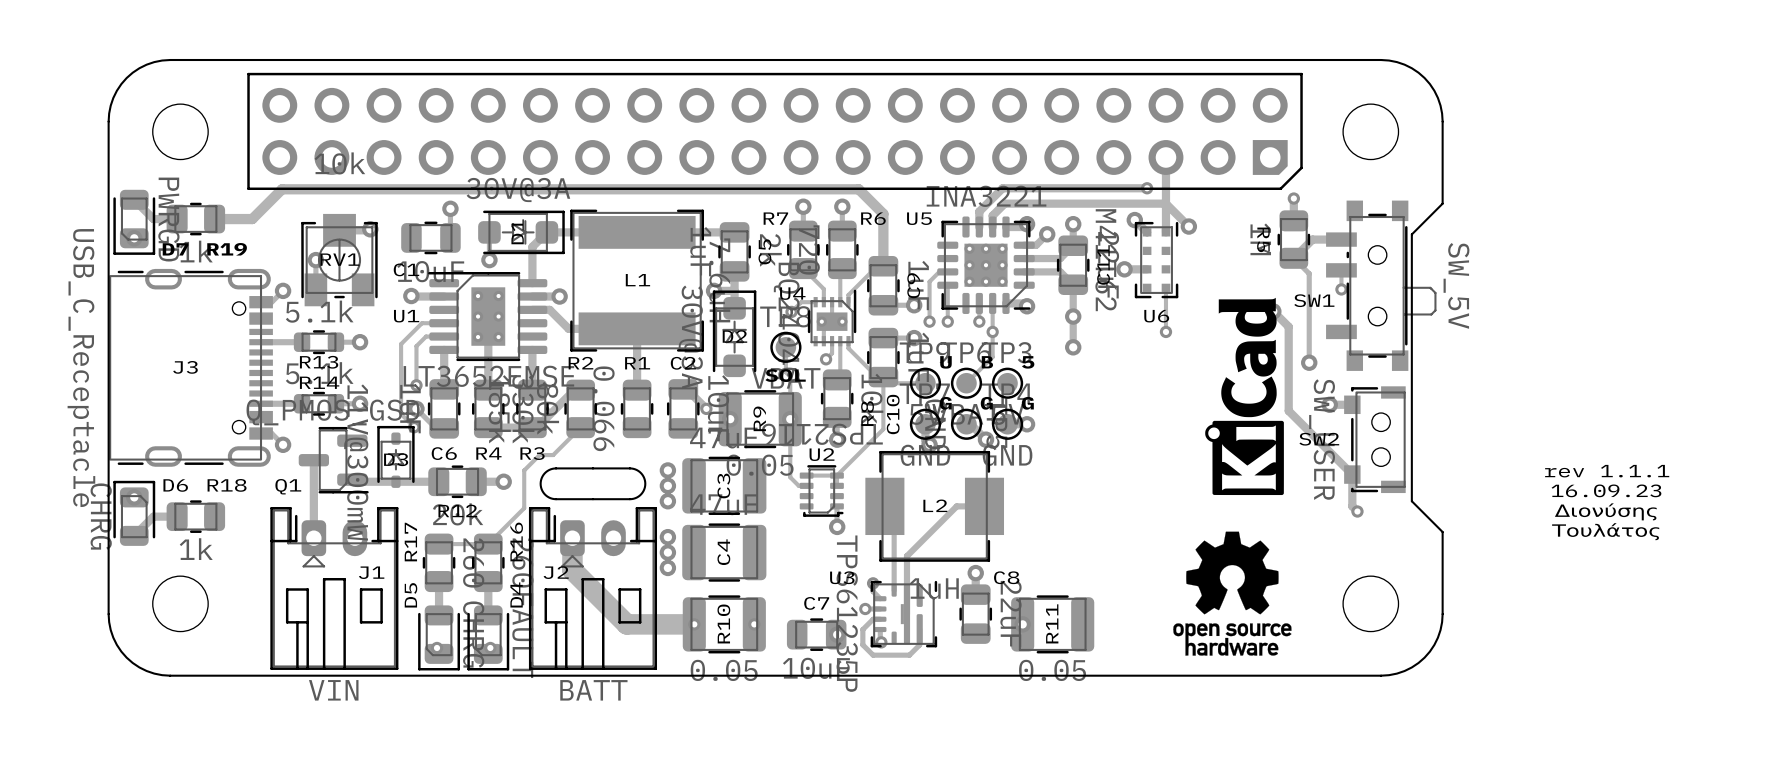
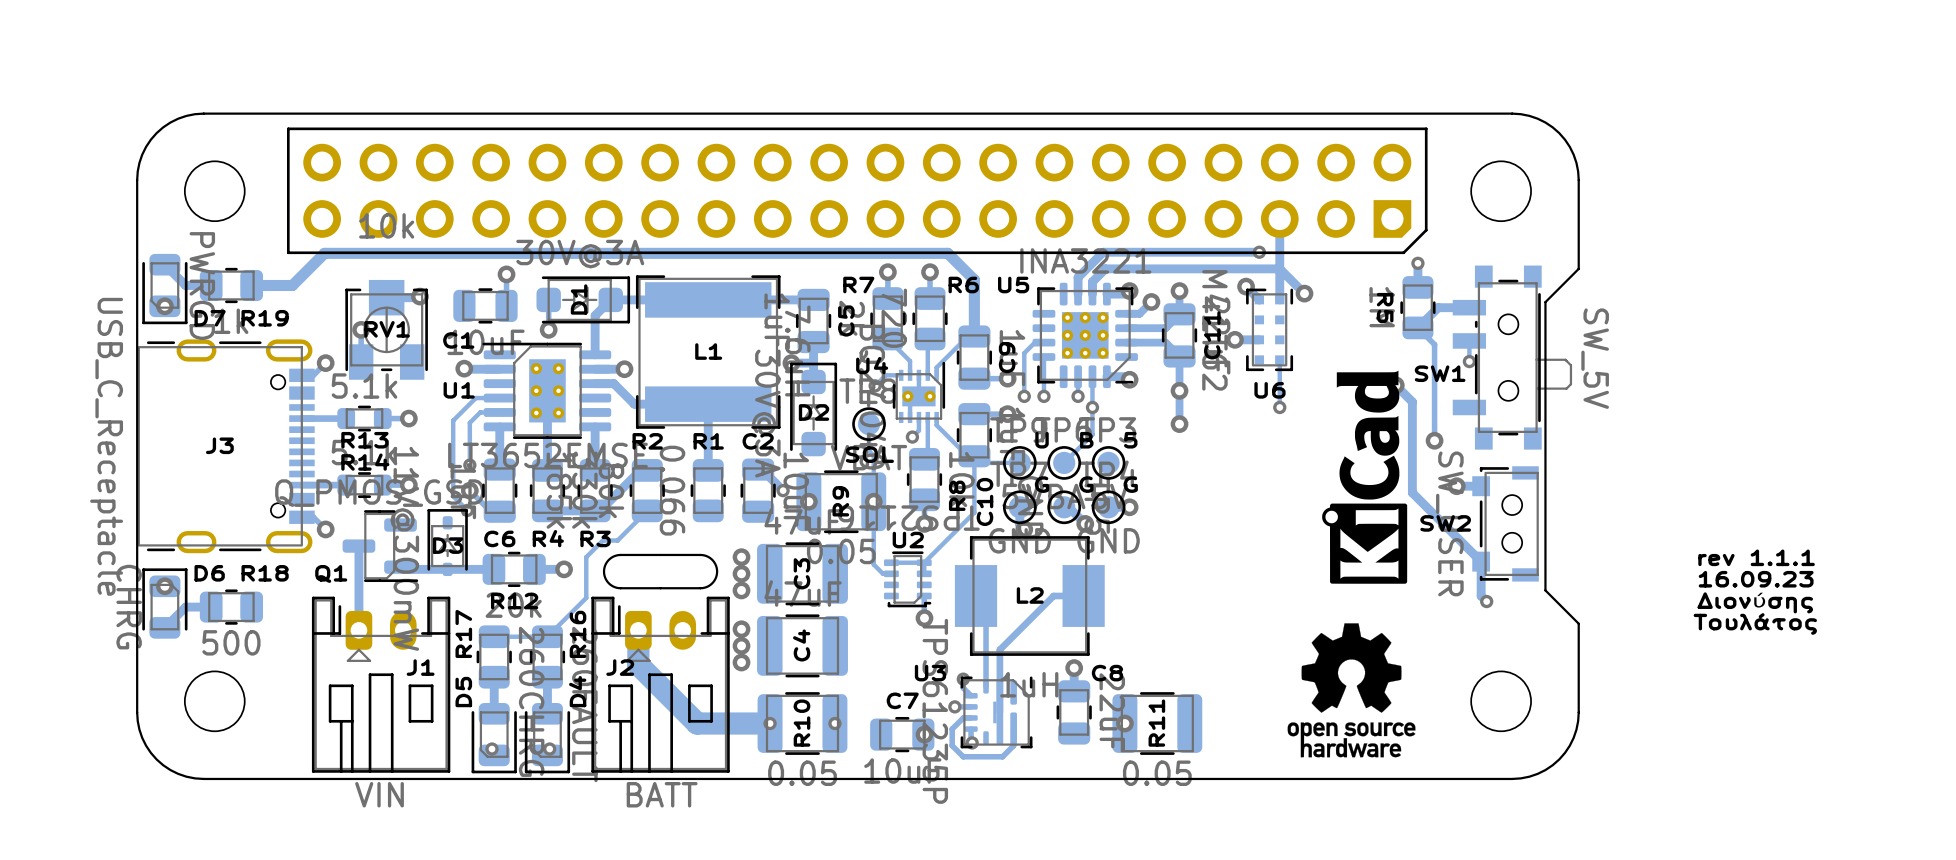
R18 value: 1k (196, 549) -> 500 (231, 642)

